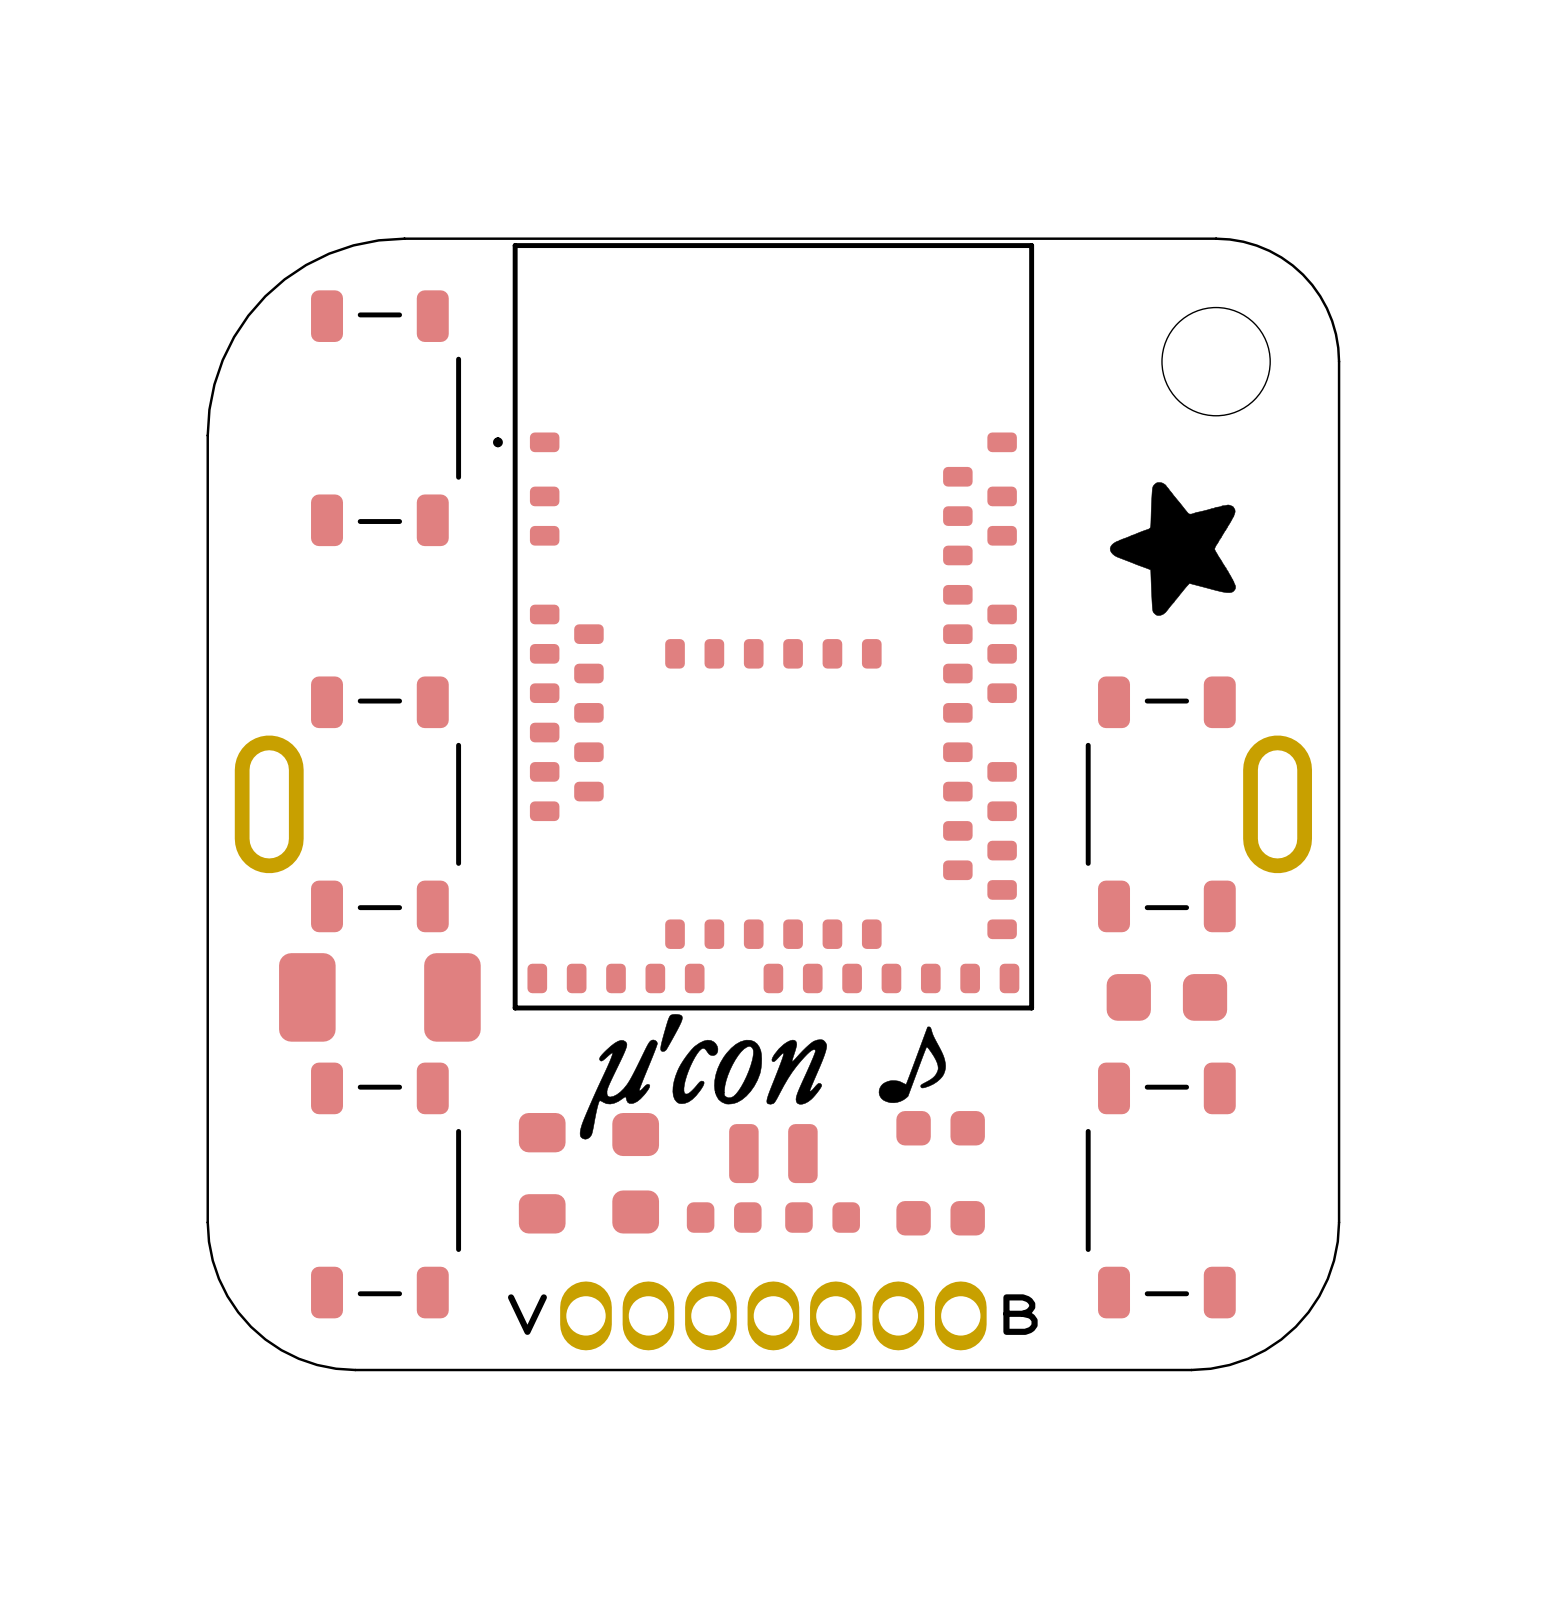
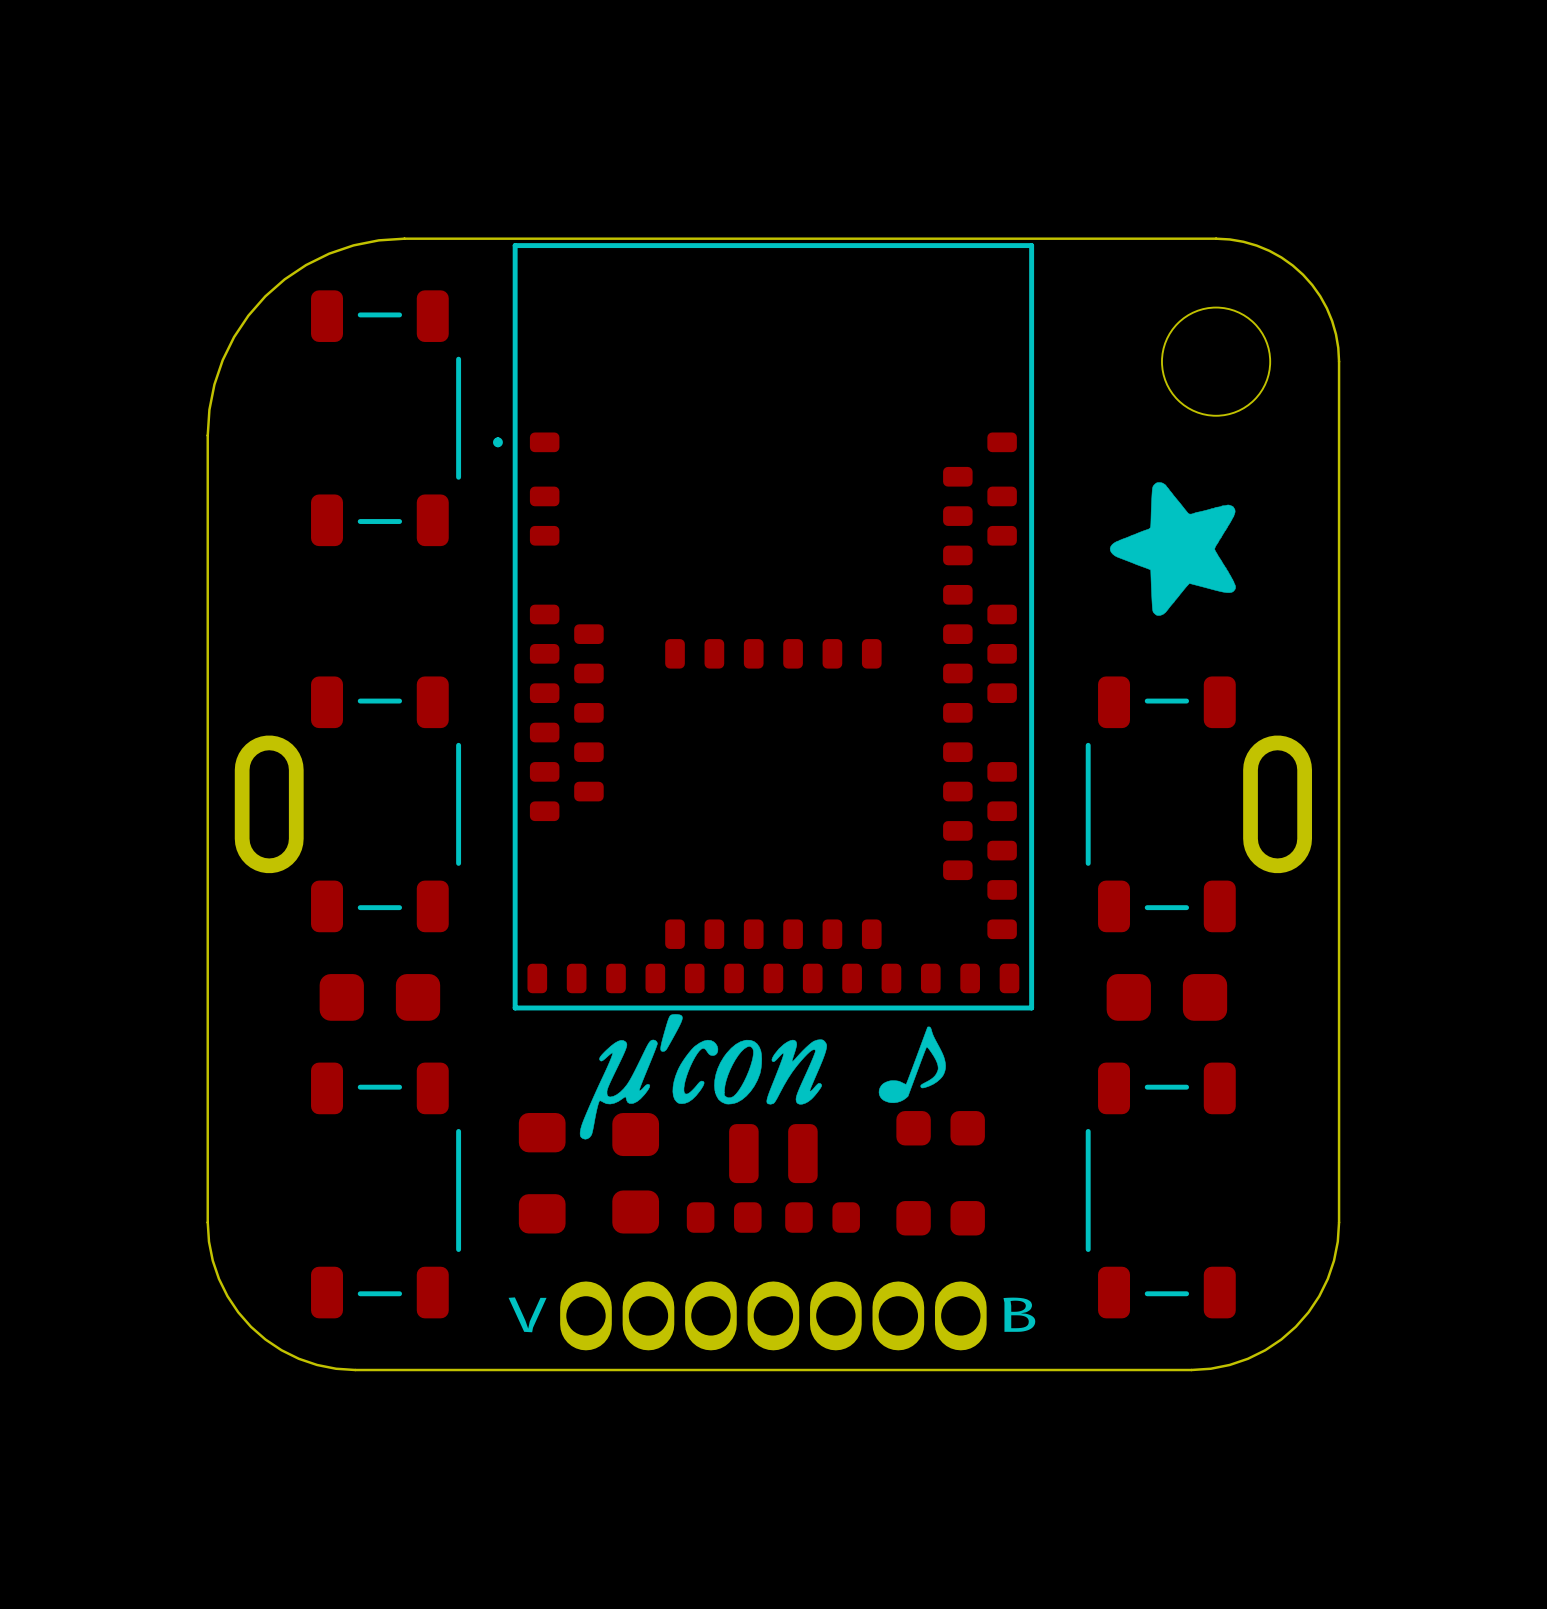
part footprint: [493, 243, 1035, 1011] -> [493, 243, 1035, 1011]
part footprint: [279, 953, 481, 1042] -> [319, 974, 441, 1021]

